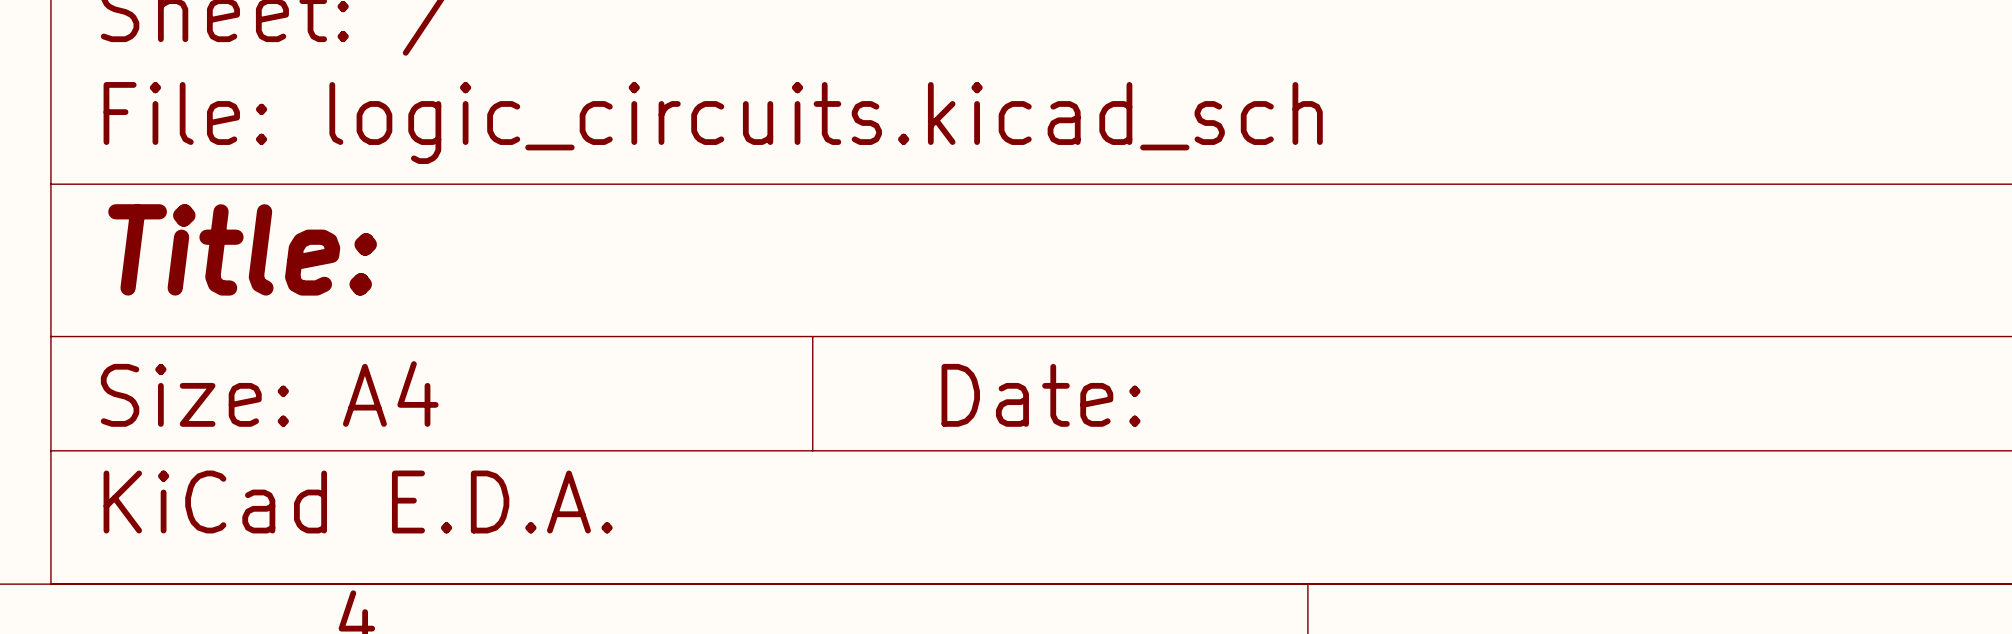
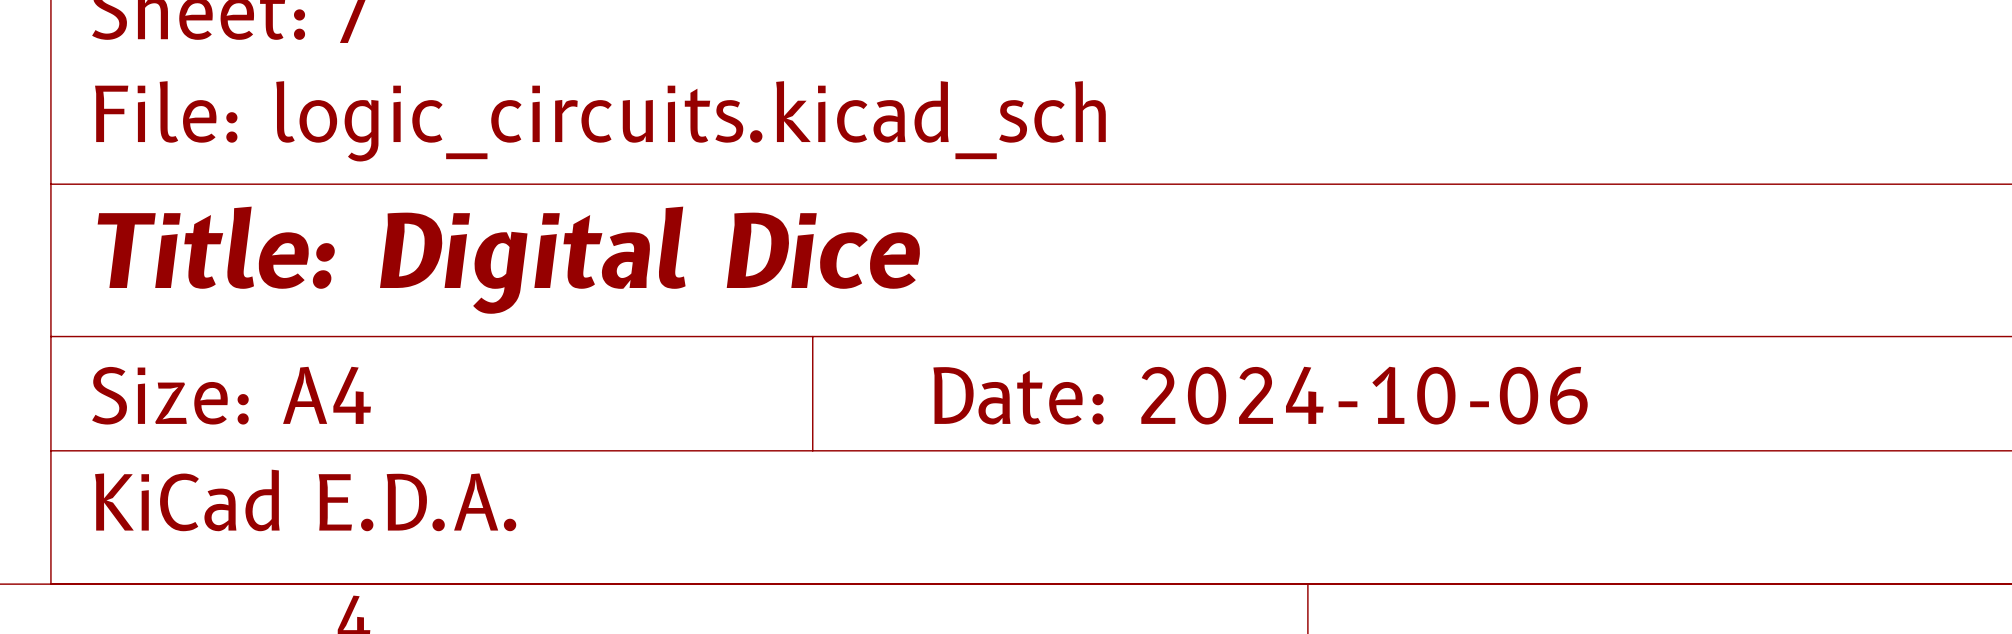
title block: Title: (242, 249) -> Title: Digital Dice (508, 260)
title block: Date: (1041, 395) -> Date: 2024-10-06 (1260, 395)

